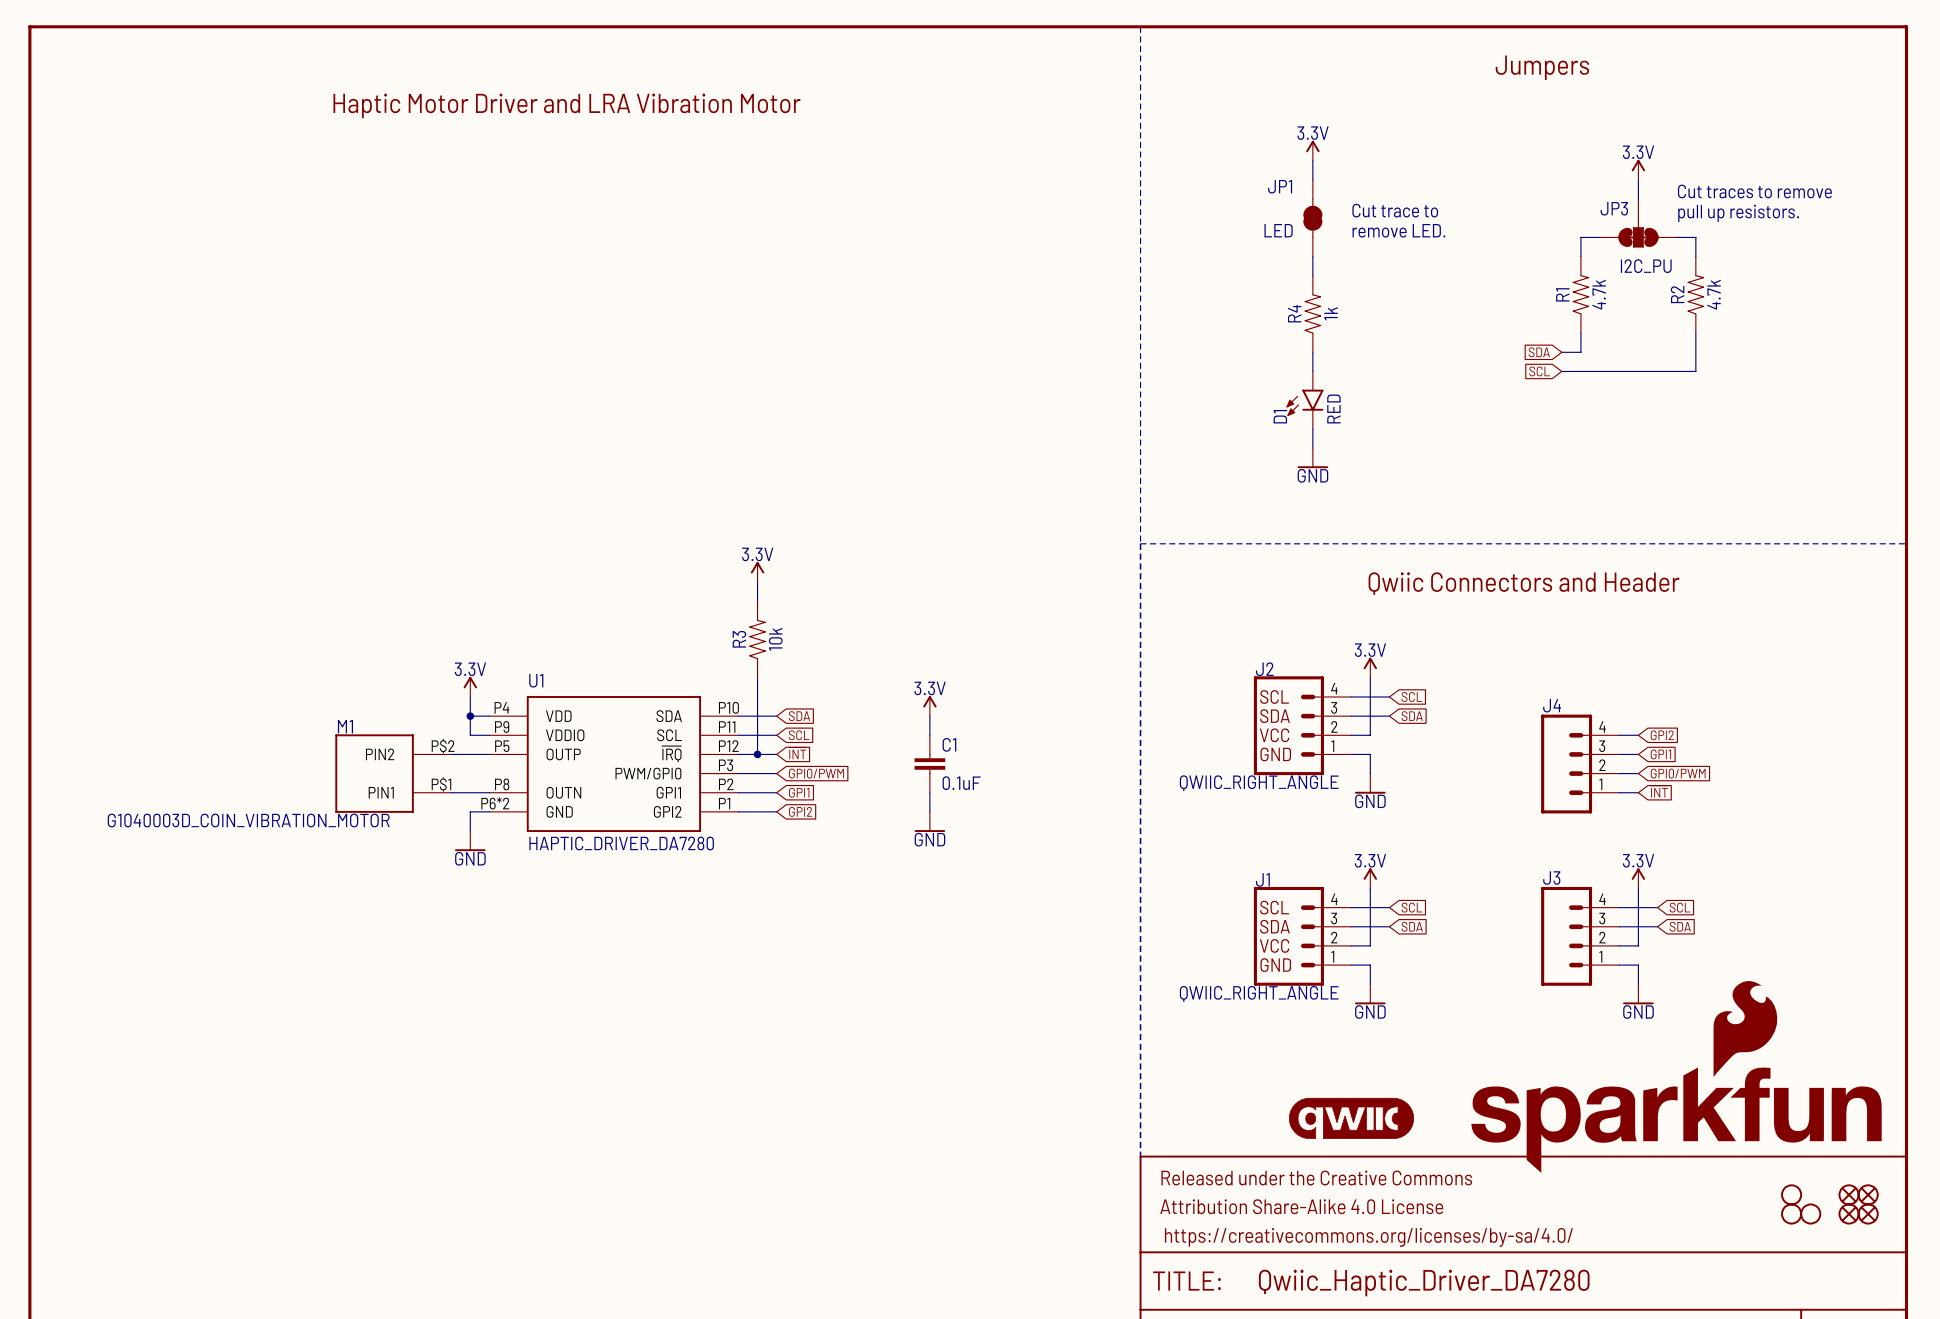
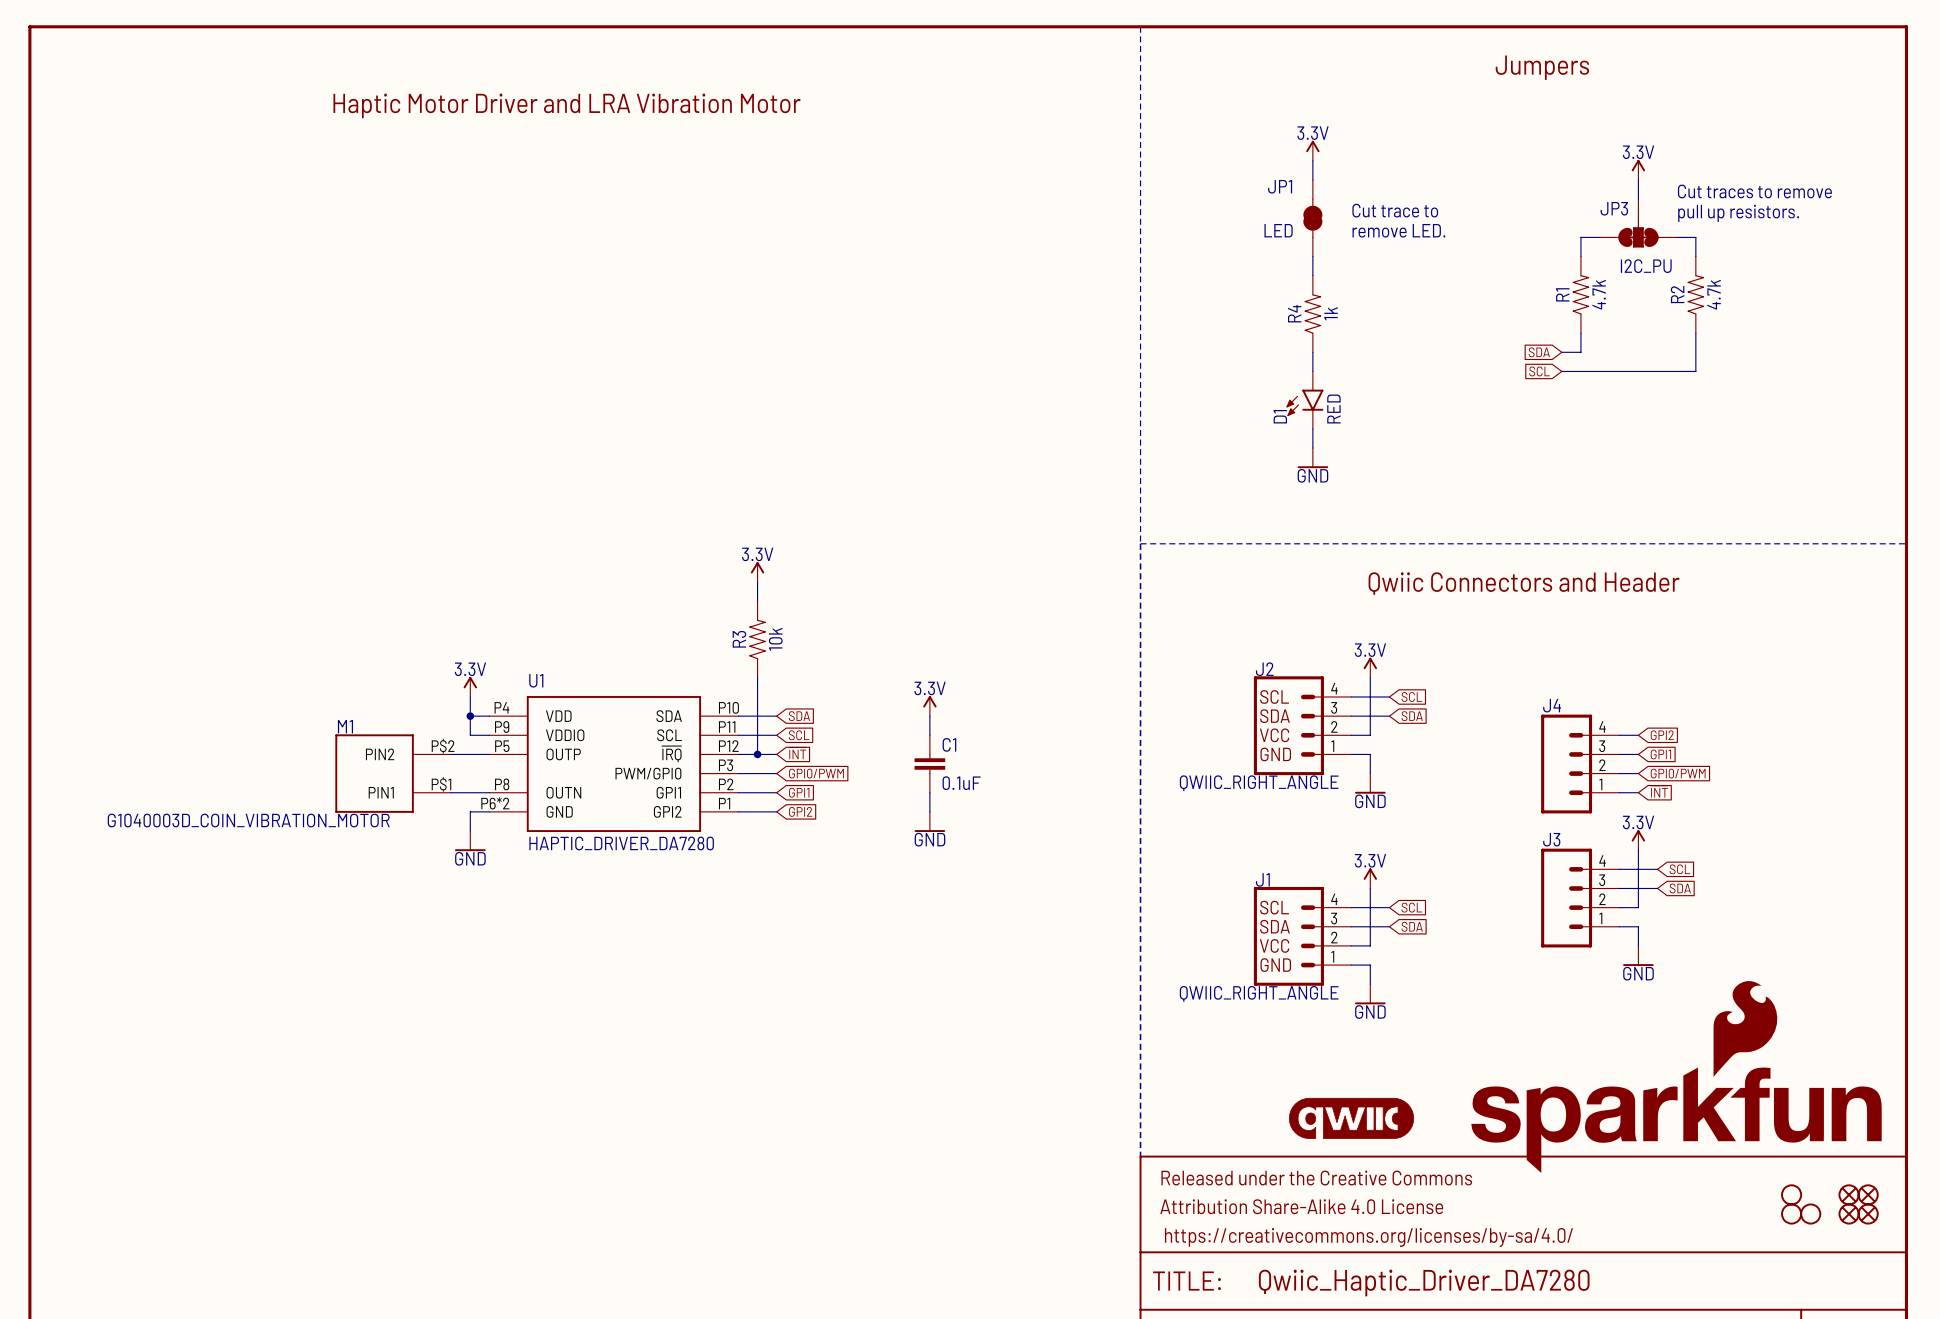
wire: none -> (1619, 869) (1657, 869)
power symbol position: 3.3V (1638, 878) -> 3.3V (1638, 840)
wire: none -> (1619, 888) (1657, 888)
wire: (1657, 907) (1638, 907) (1638, 926) (1657, 926) -> none
global label position: SCL (1679, 907) -> SCL (1679, 869)
global label position: SDA (1680, 926) -> SDA (1680, 888)
J3 position: (1580, 936) -> (1580, 898)
wire: (1619, 945) (1638, 945) -> none
wire: (1619, 965) (1638, 965) (1638, 984) -> none
power symbol position: GND (1638, 994) -> GND (1638, 955)

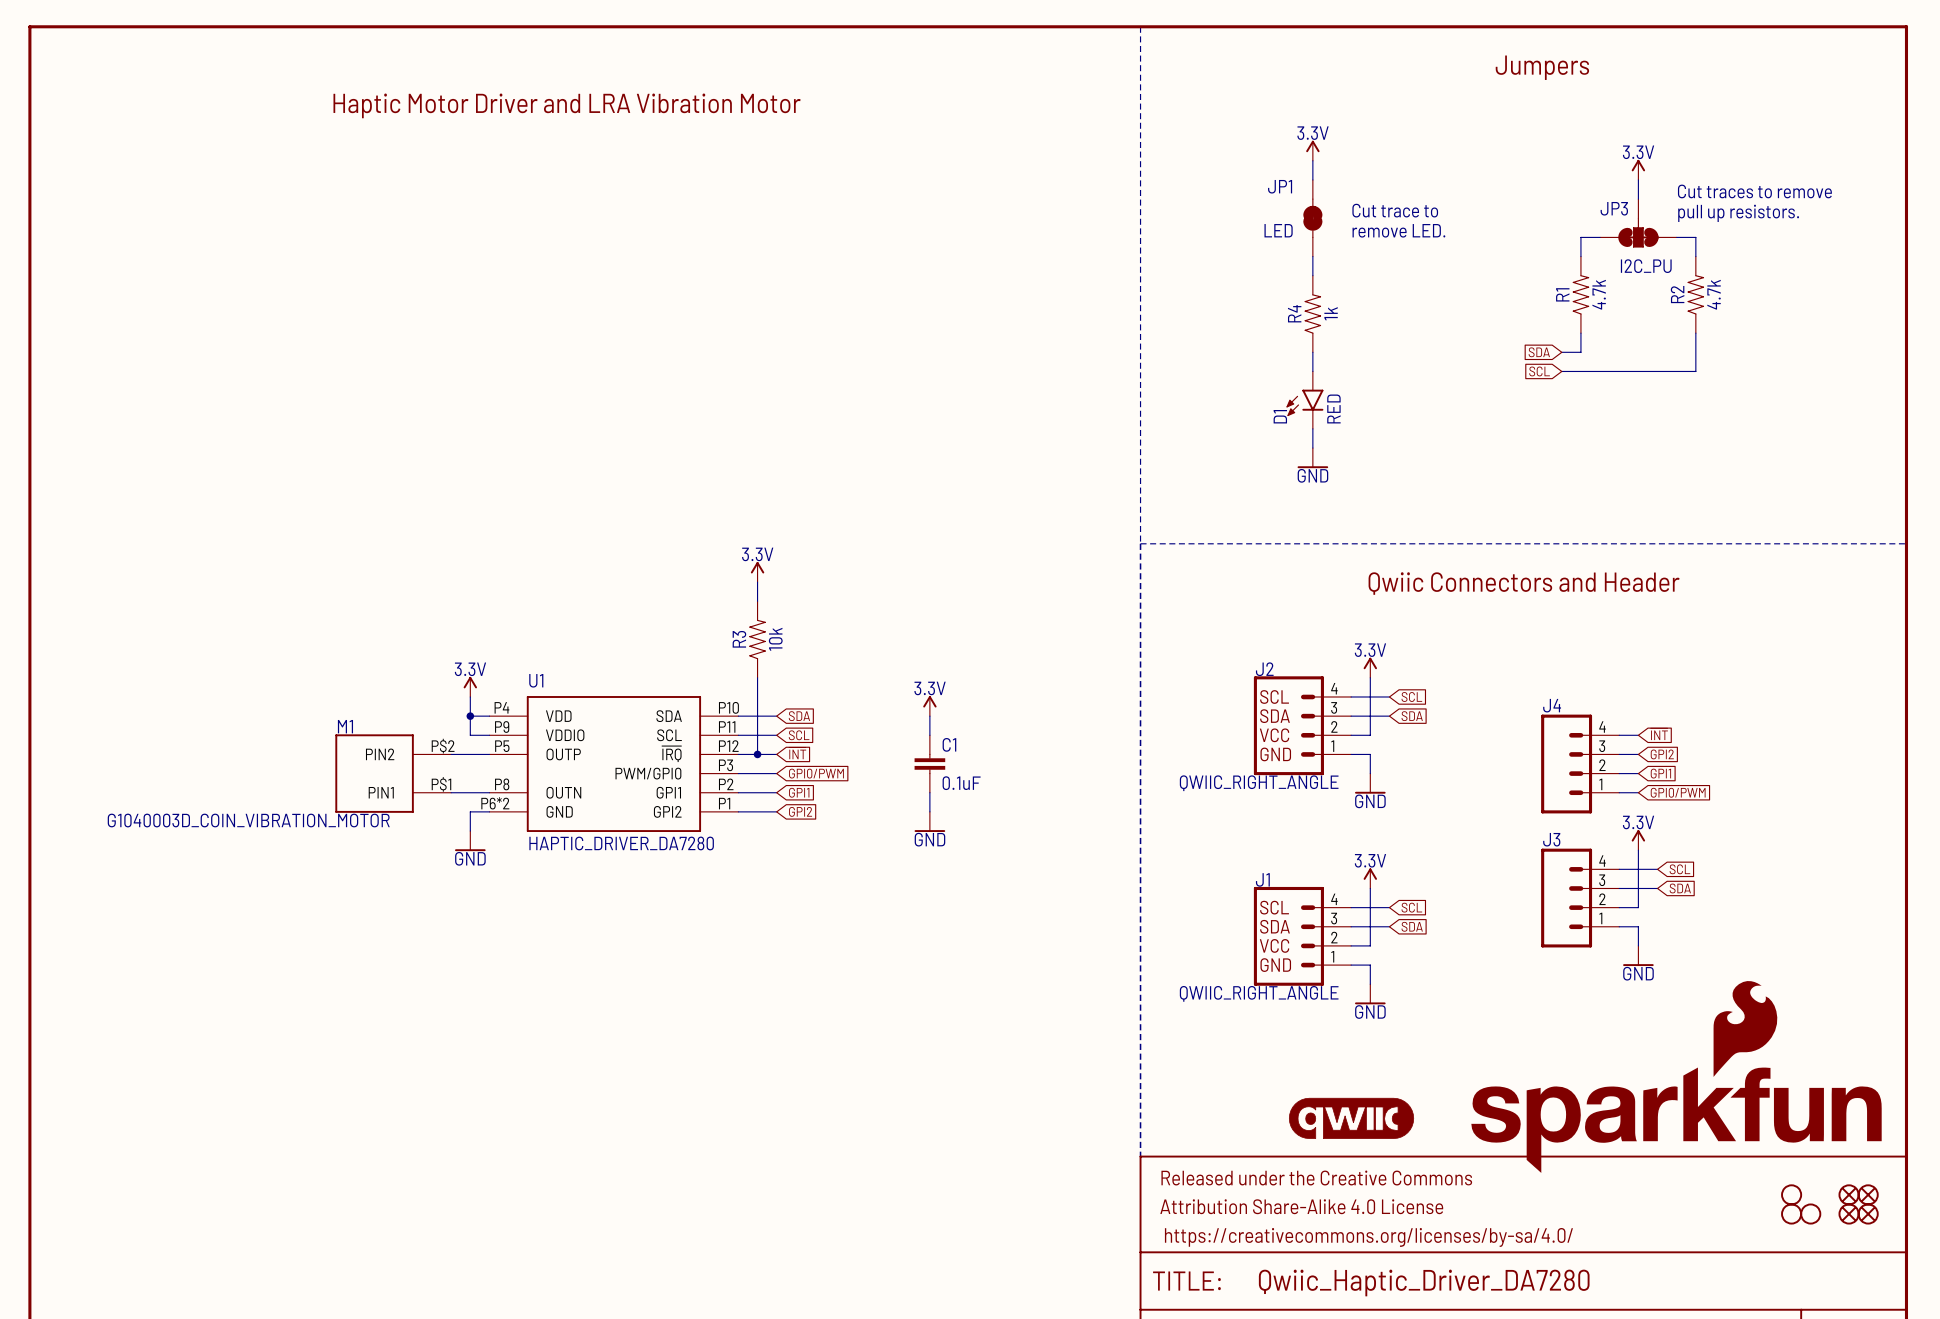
global label: GPI2 (1662, 735) -> ~{INT} (1659, 734)
global label: GPI1 (1660, 754) -> GPI2 (1662, 754)
global label: GPI0/PWM (1678, 773) -> GPI1 (1660, 773)
global label: ~{INT} (1659, 791) -> GPI0/PWM (1678, 792)

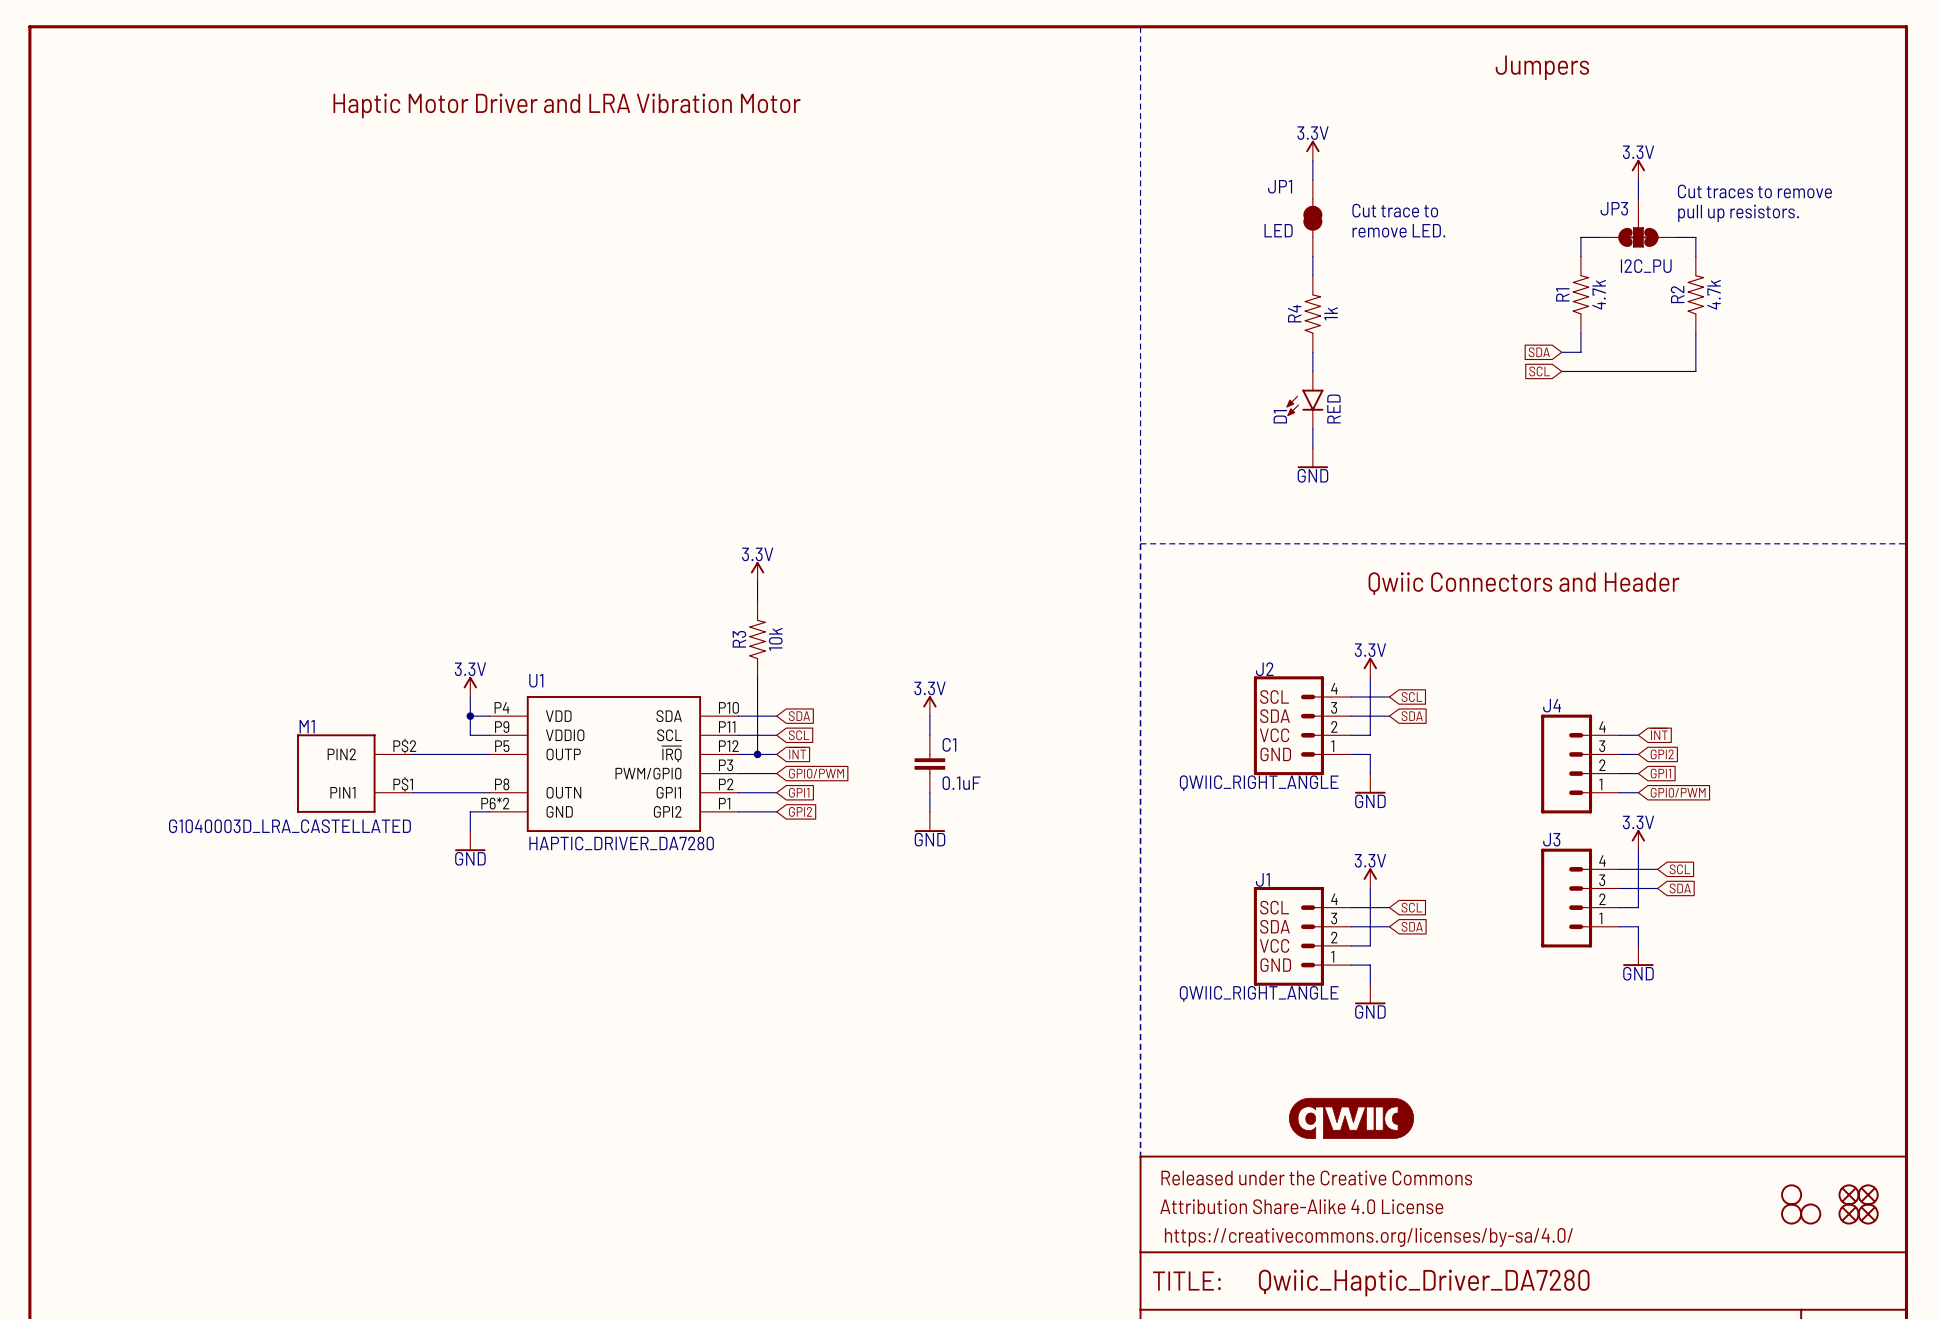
M1 position: (393, 773) -> (354, 773)
M1 value: G1040003D_COIN_VIBRATION_MOTOR (248, 820) -> G1040003D_LRA_CASTELLATED (289, 826)
part: (1676, 1076) -> none

